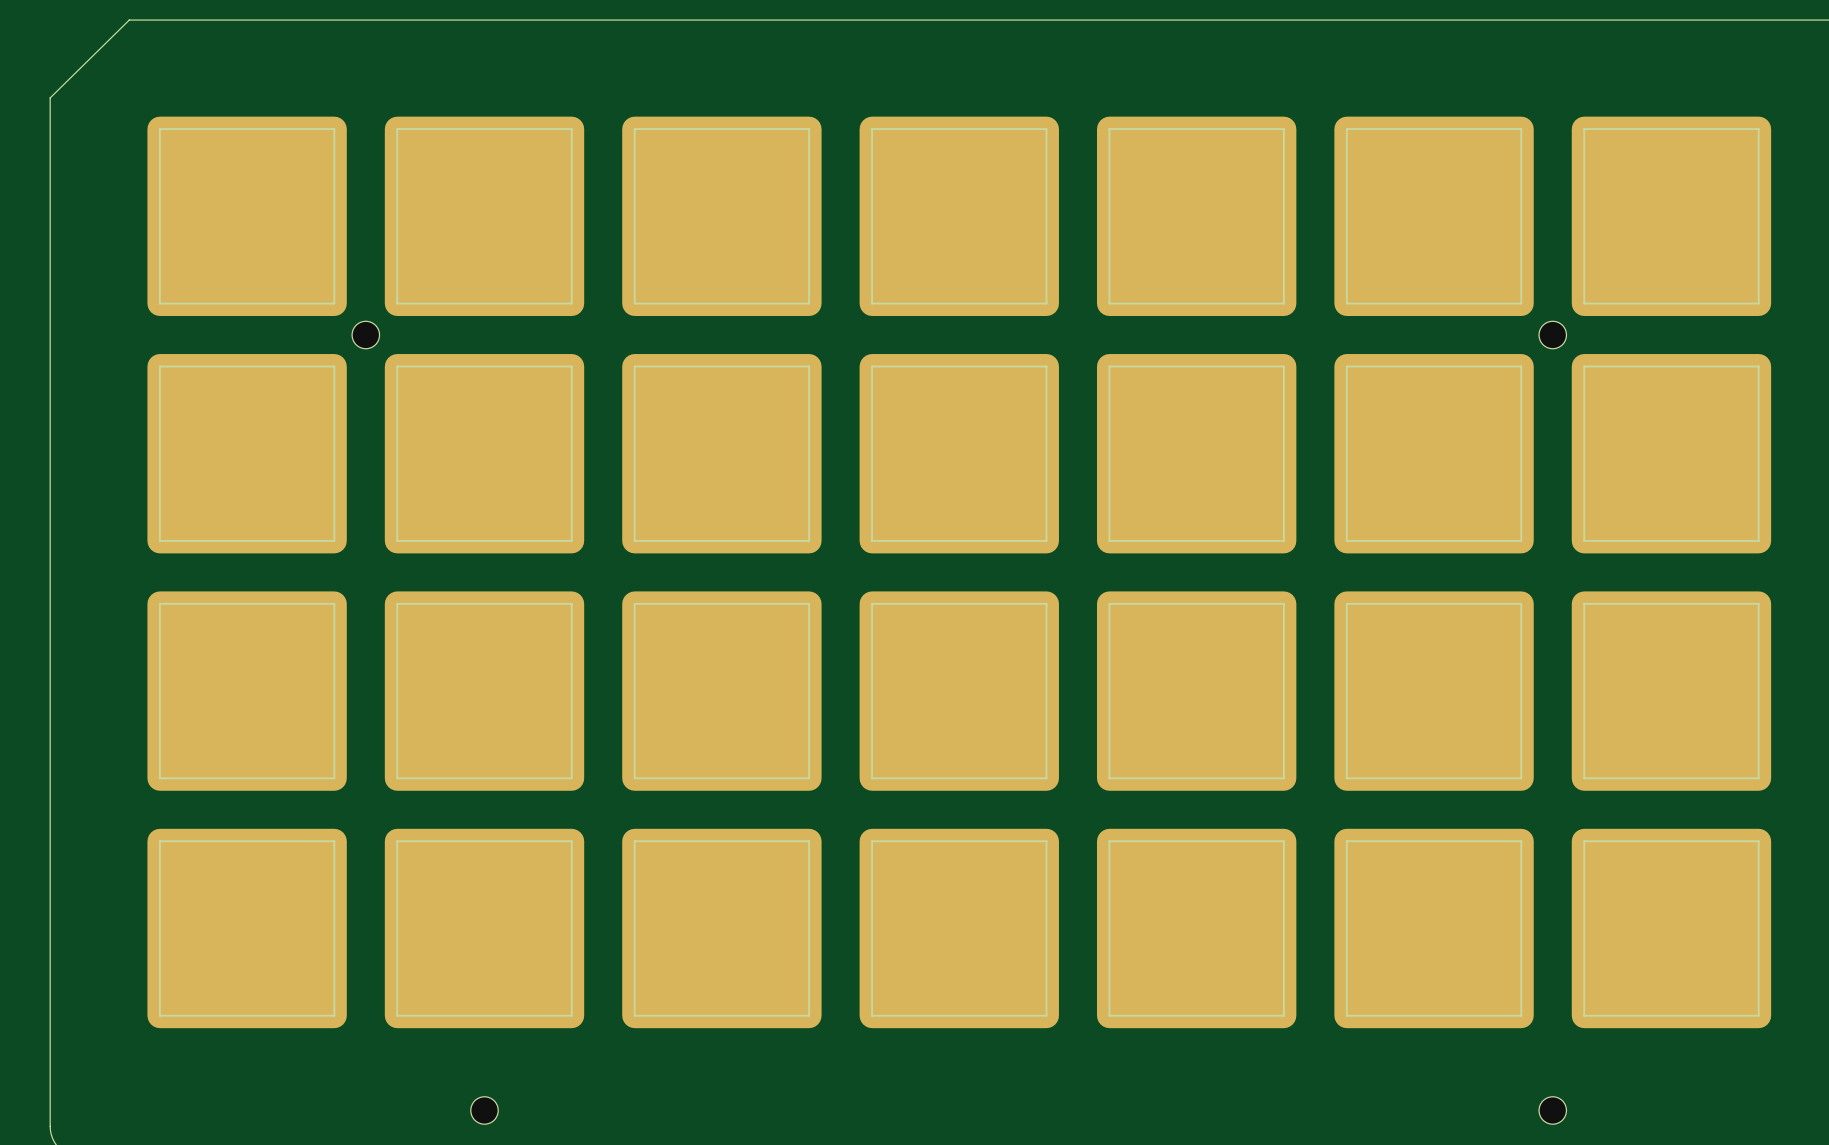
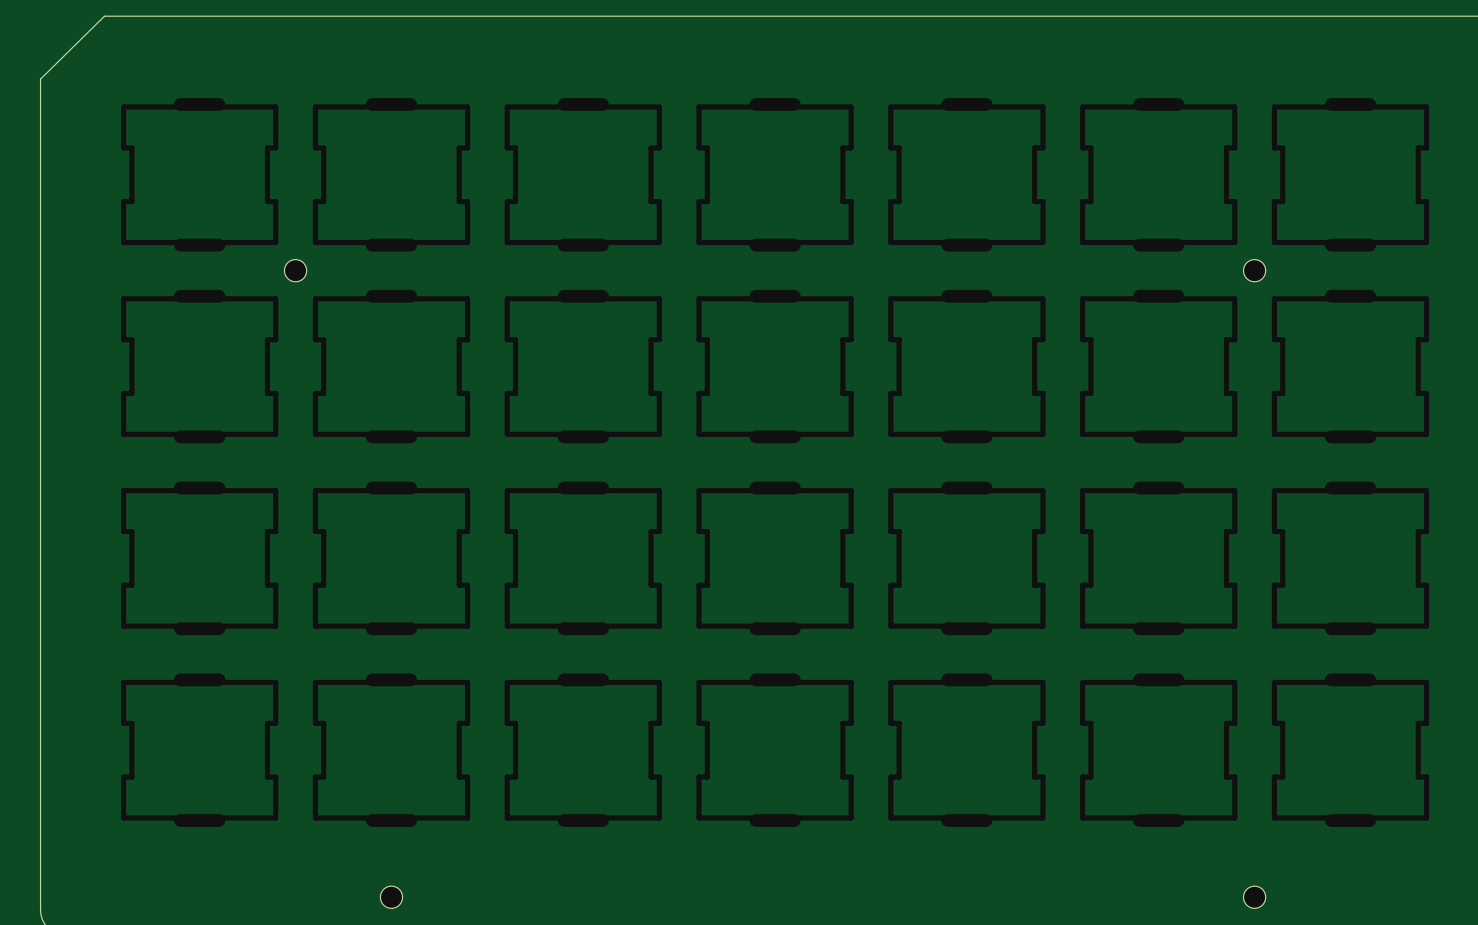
part footprint: [147, 116, 347, 317] -> [121, 98, 279, 252]
part footprint: [384, 116, 585, 317] -> [312, 98, 471, 252]
part footprint: [622, 116, 822, 317] -> [504, 98, 662, 252]
part footprint: [859, 116, 1059, 317] -> [696, 98, 854, 252]
part footprint: [1096, 116, 1297, 317] -> [888, 98, 1046, 252]
part footprint: [1334, 116, 1534, 317] -> [1080, 98, 1238, 252]
part footprint: [1571, 116, 1772, 317] -> [1271, 98, 1430, 252]
part footprint: [147, 354, 347, 554] -> [121, 289, 279, 444]
part footprint: [384, 354, 585, 554] -> [312, 289, 471, 444]
part footprint: [622, 354, 822, 554] -> [504, 289, 662, 444]
part footprint: [859, 354, 1059, 554] -> [696, 289, 854, 444]
part footprint: [1096, 354, 1297, 554] -> [888, 289, 1046, 444]
part footprint: [1334, 354, 1534, 554] -> [1080, 289, 1238, 444]
part footprint: [1571, 354, 1772, 554] -> [1271, 289, 1430, 444]
part footprint: [147, 591, 347, 791] -> [121, 481, 279, 636]
part footprint: [384, 591, 585, 791] -> [312, 481, 471, 636]
part footprint: [622, 591, 822, 791] -> [504, 481, 662, 636]
part footprint: [859, 591, 1059, 791] -> [696, 481, 854, 636]
part footprint: [1096, 591, 1297, 791] -> [888, 481, 1046, 636]
part footprint: [1334, 591, 1534, 791] -> [1080, 481, 1238, 636]
part footprint: [1571, 591, 1772, 791] -> [1271, 481, 1430, 636]
part footprint: [147, 828, 347, 1029] -> [121, 673, 279, 827]
part footprint: [384, 828, 585, 1029] -> [312, 673, 471, 827]
part footprint: [622, 828, 822, 1029] -> [504, 673, 662, 827]
part footprint: [859, 828, 1059, 1029] -> [696, 673, 854, 827]
part footprint: [1096, 828, 1297, 1029] -> [888, 673, 1046, 827]
part footprint: [1334, 828, 1534, 1029] -> [1080, 673, 1238, 827]
part footprint: [1571, 828, 1772, 1029] -> [1271, 673, 1430, 827]

